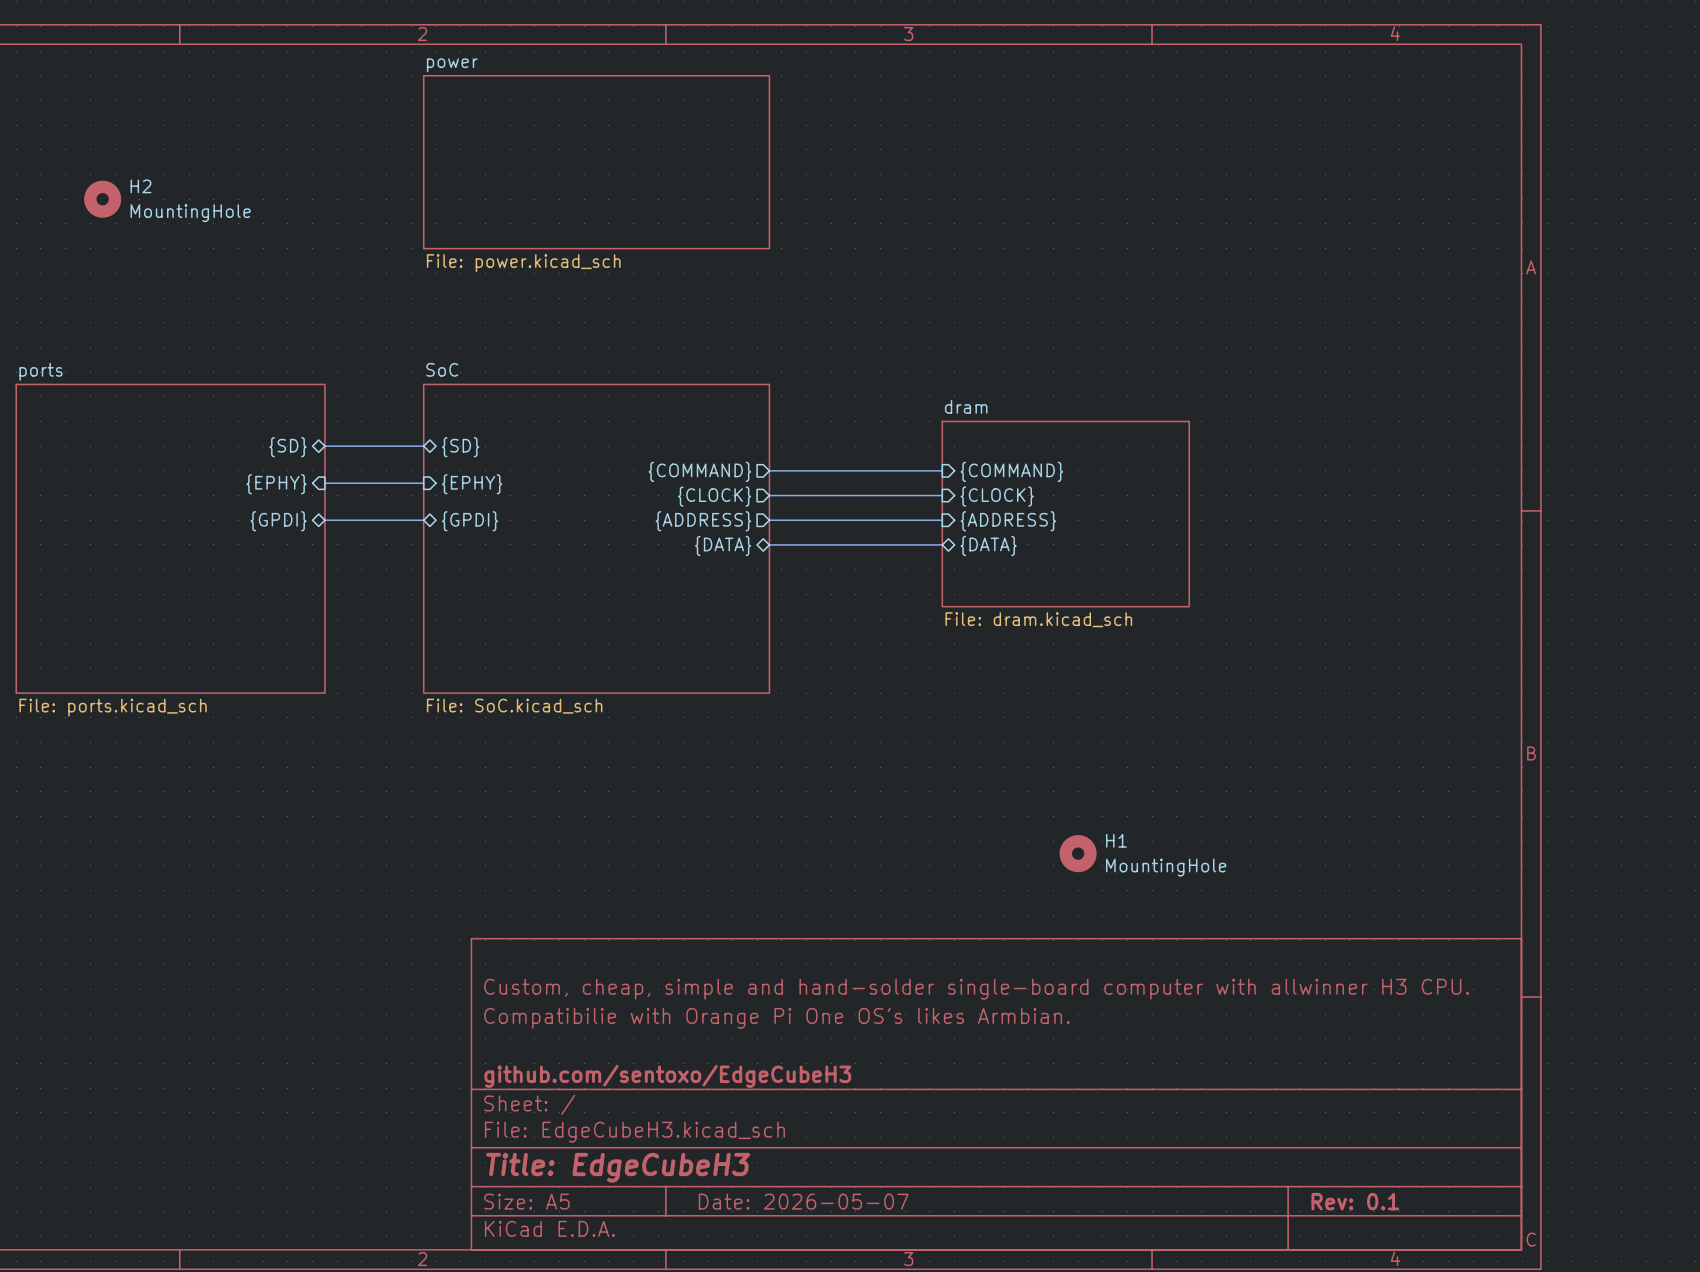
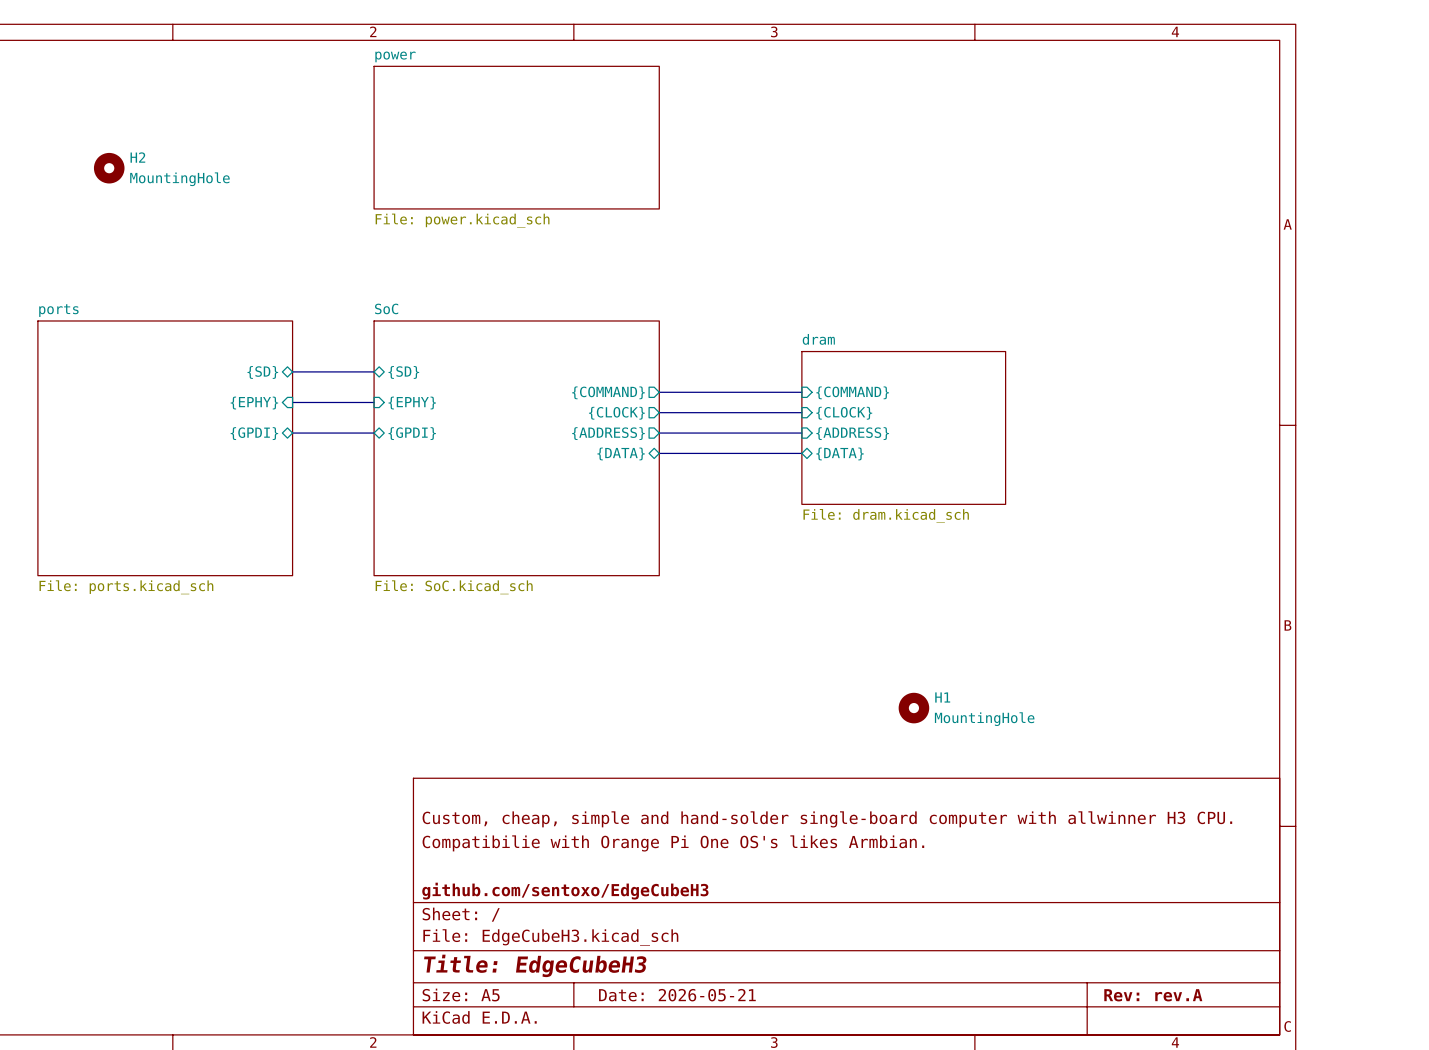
title block: Date: 2026-05-07 (803, 1201) -> Date: 2026-05-21 (677, 995)
title block: Rev: 0.1 (1355, 1201) -> Rev: rev.A (1153, 995)

